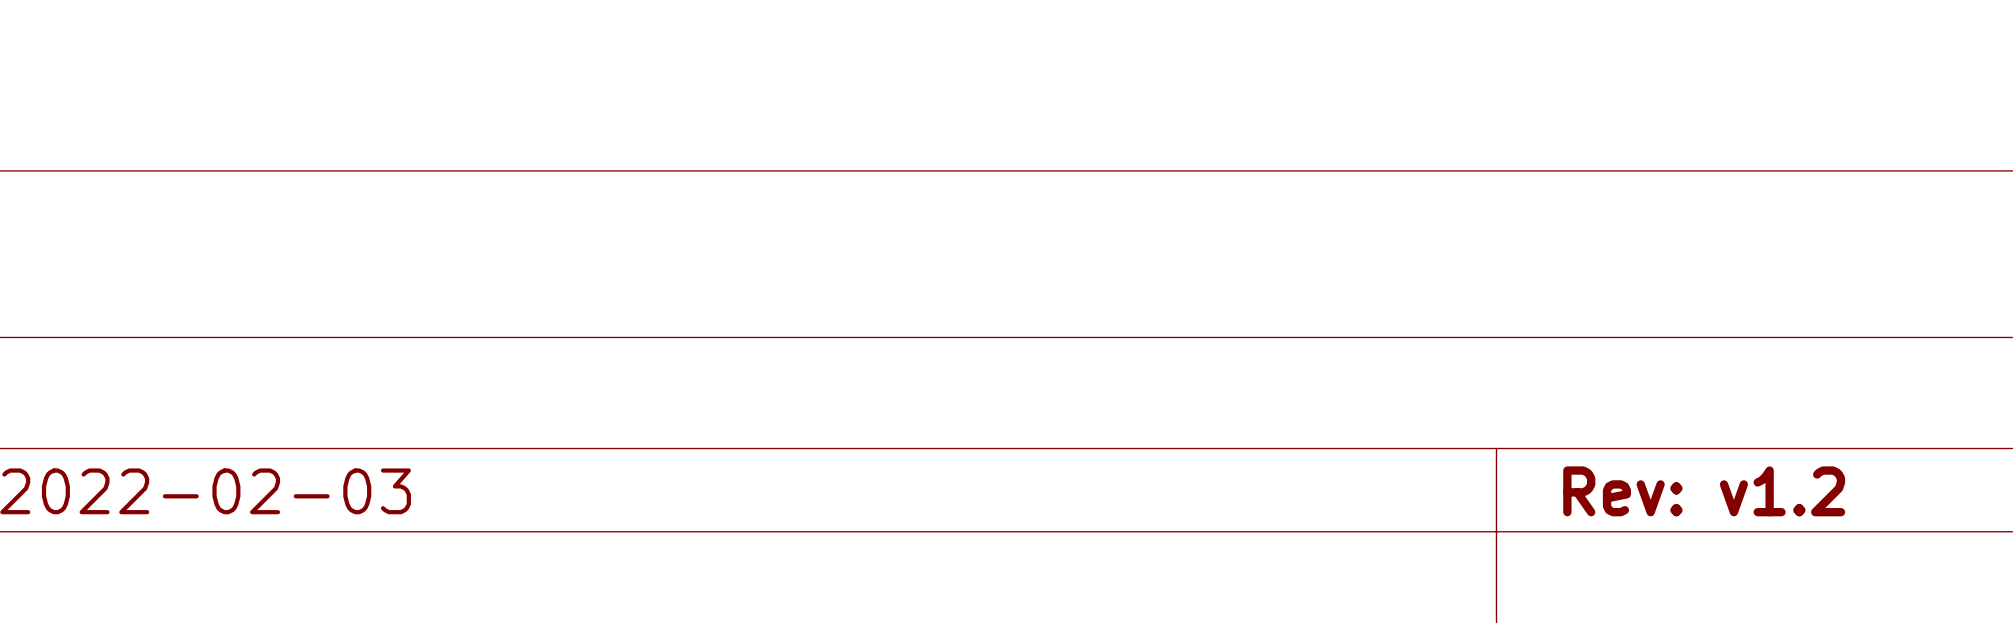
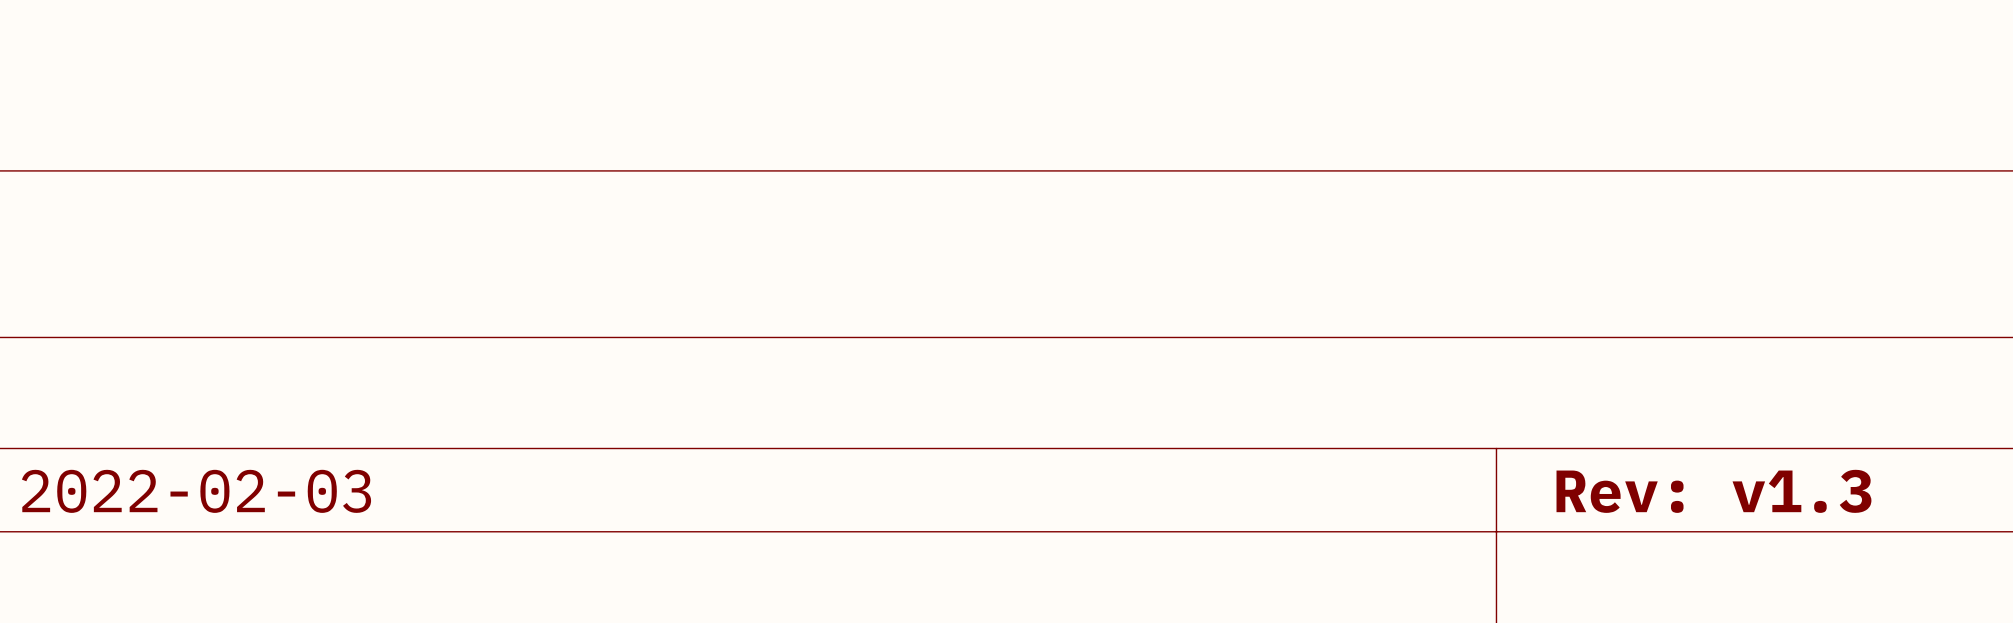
title block: Rev: v1.2 (1704, 491) -> Rev: v1.3 (1713, 491)

